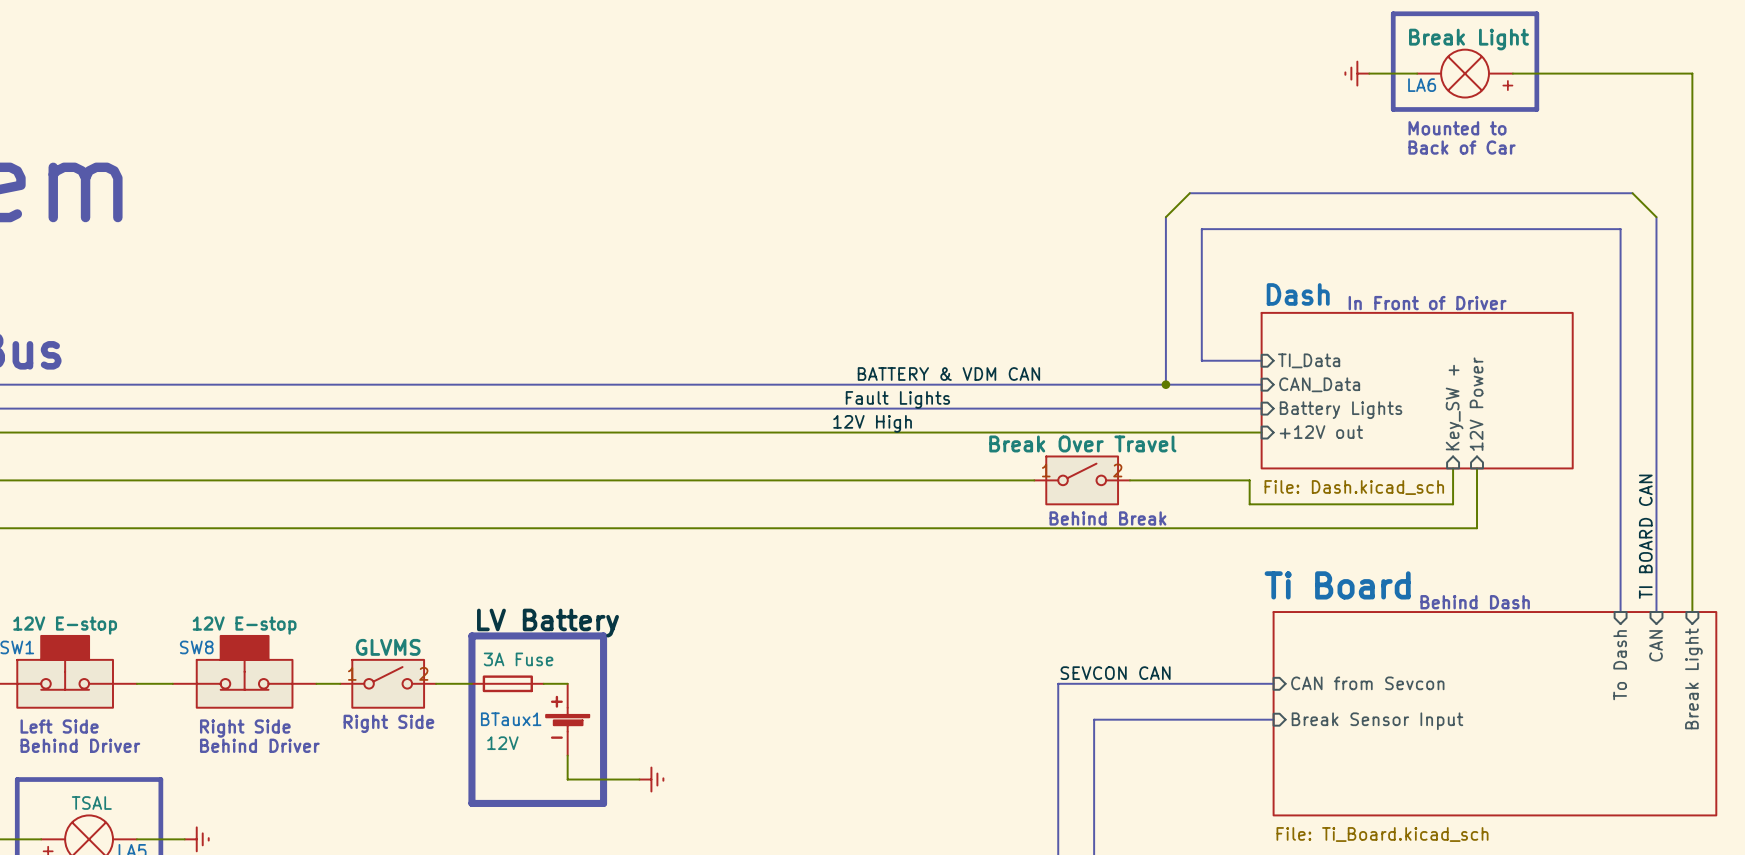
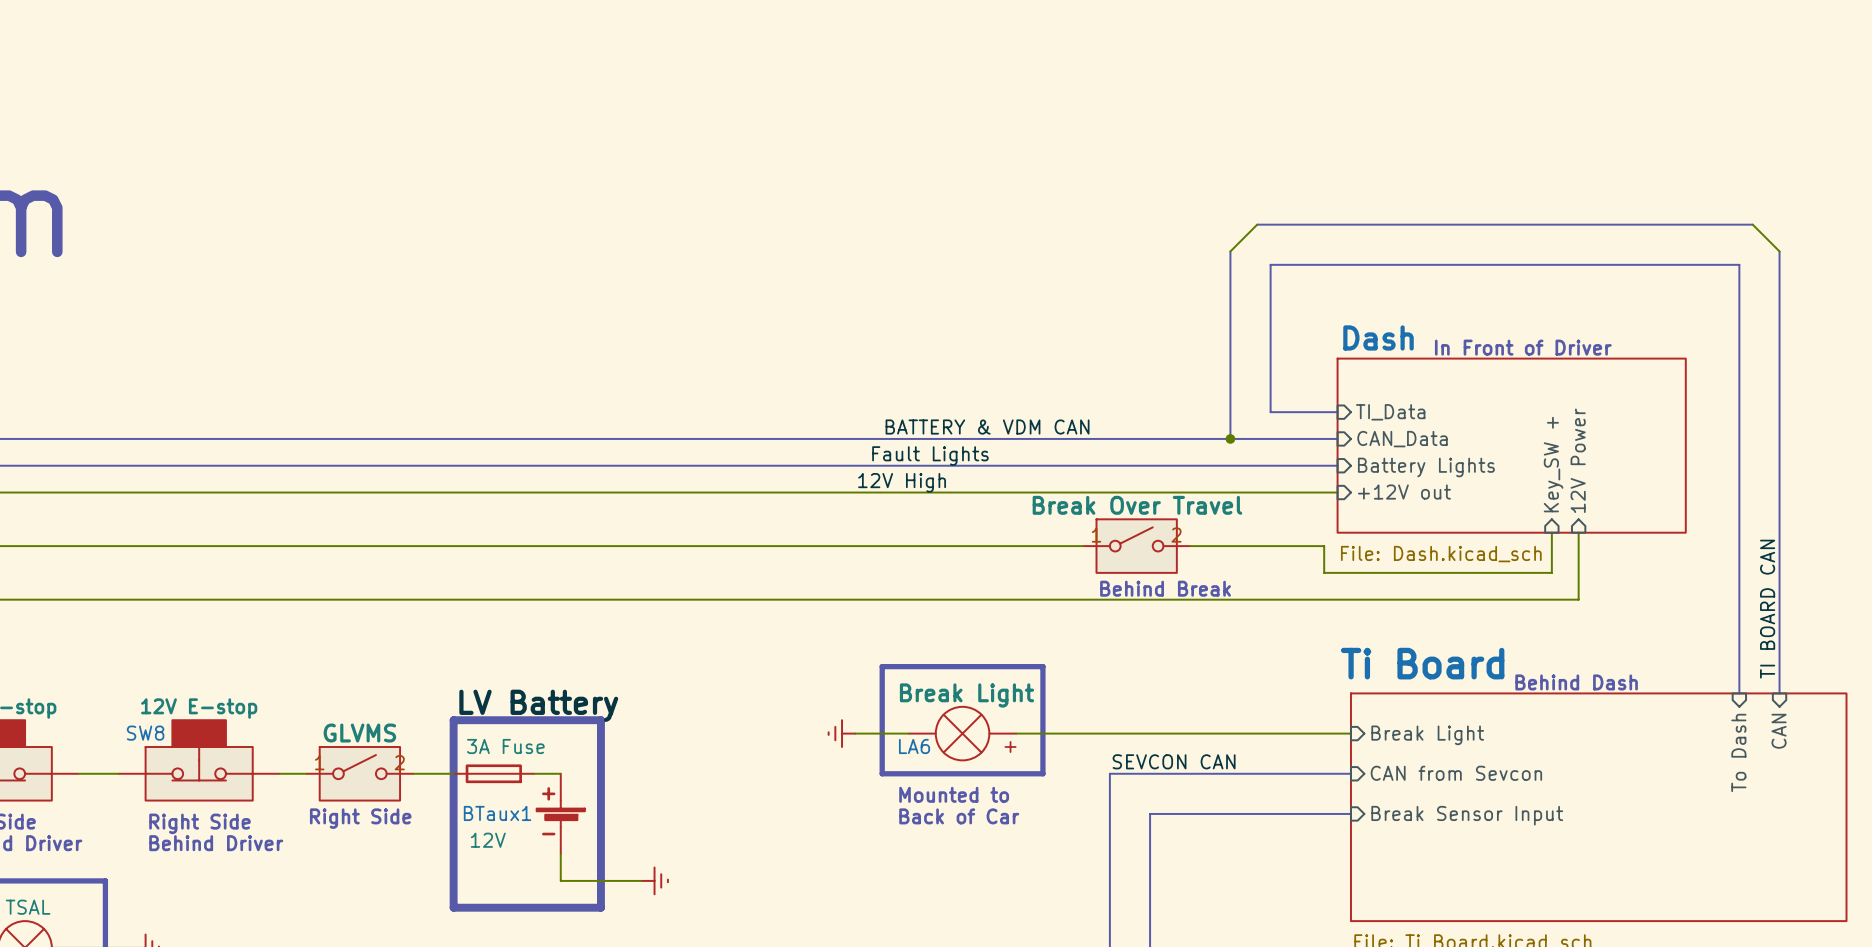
line: (1393, 13) (1536, 13) (1536, 109) (1393, 109) (1393, 13) -> none
power symbol: (1357, 73) -> none
wire: (1369, 73) (1417, 73) -> none
LA6 position: (1465, 73) -> (962, 733)
wire: (1512, 73) (1692, 73) (1692, 612) -> none
text: Mounted to (1457, 128) -> none
text: Back of Car (1462, 147) -> none
line: none -> (882, 666) (1042, 666) (1042, 773) (882, 773) (882, 666)
power symbol: none -> (842, 733)
wire: none -> (855, 733) (908, 733)
wire: none -> (1016, 733) (1350, 733)
sheet pin: none -> Break Light (1427, 735)
sheet pin: Break Light (1693, 678) -> none
text: none -> Mounted to (954, 794)
text: none -> Back of Car (959, 816)

